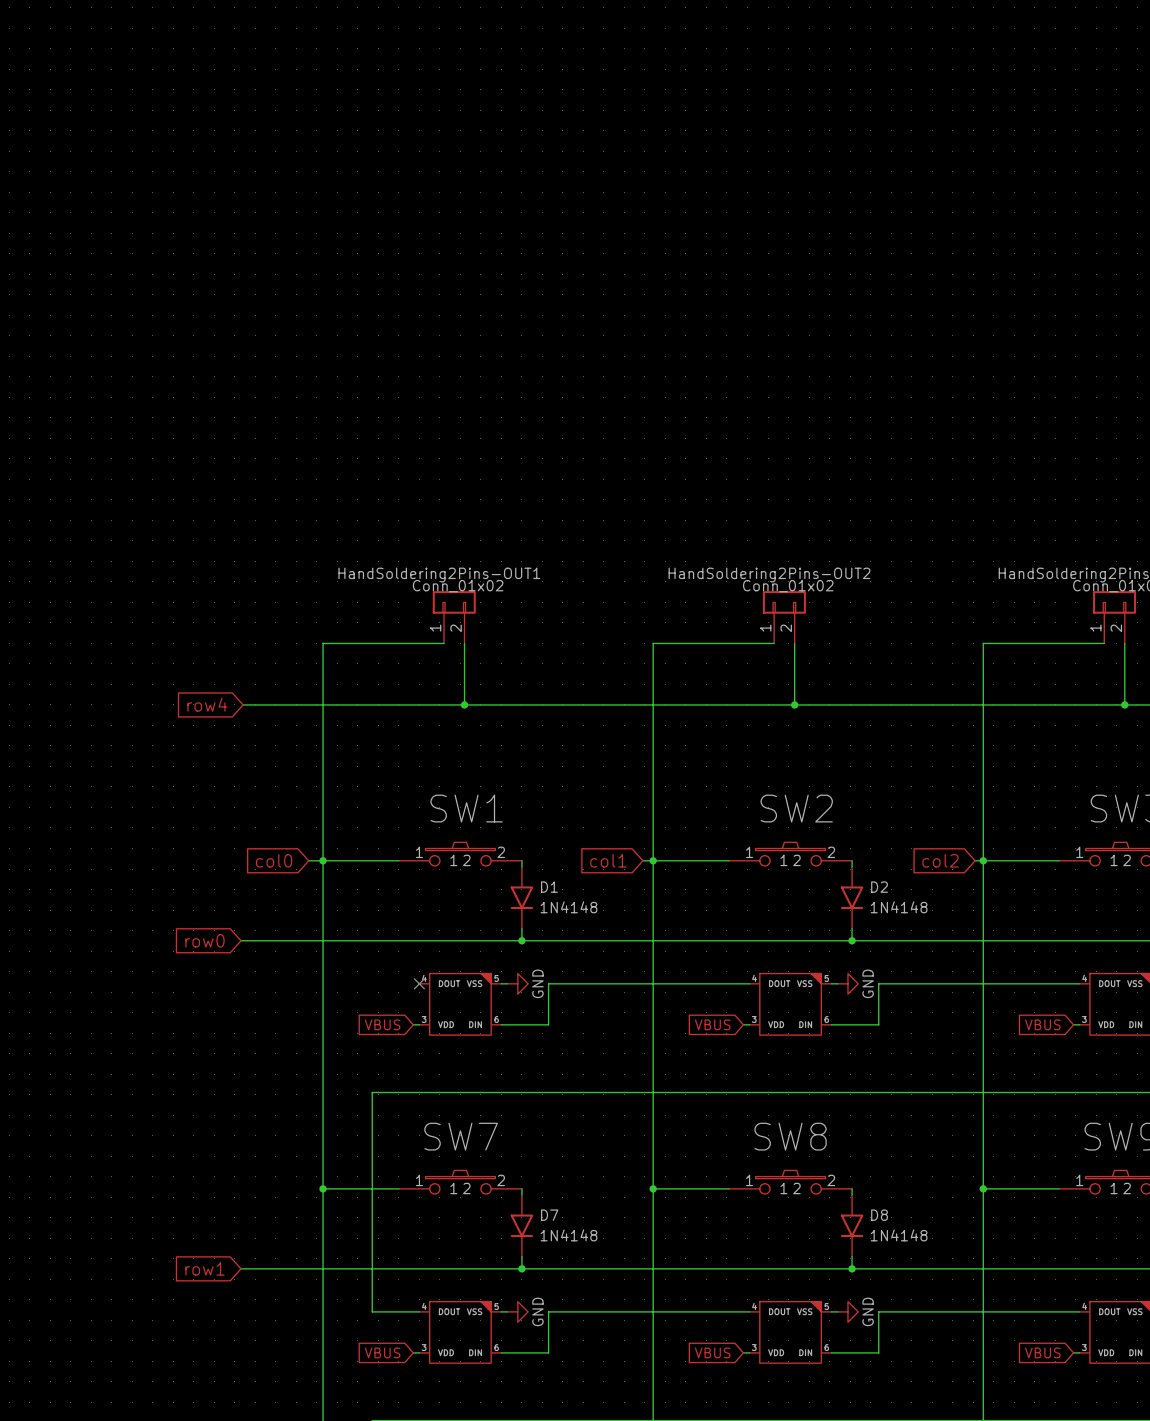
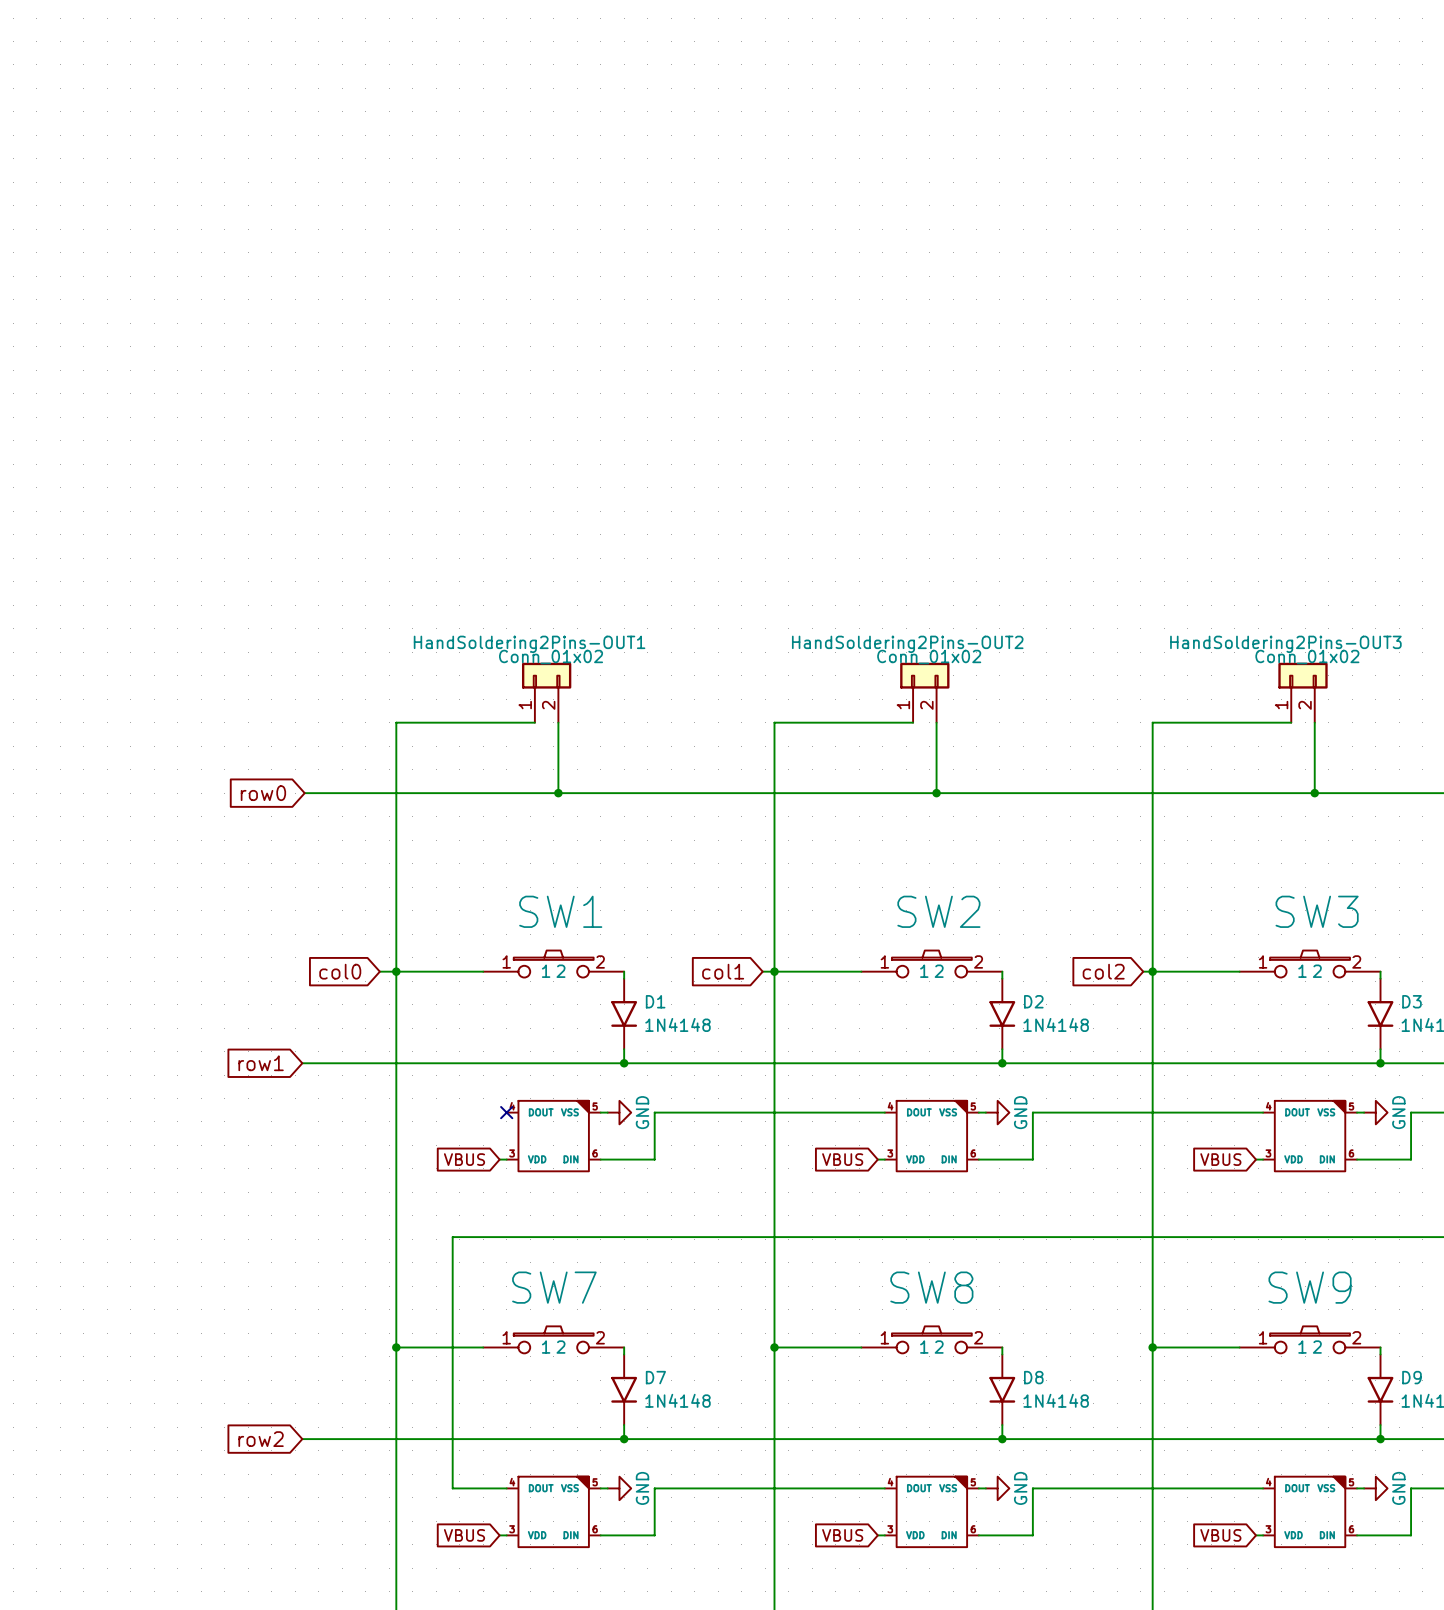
global label: row4 (207, 704) -> row0 (263, 793)
global label: row0 (204, 940) -> row1 (261, 1063)
global label: row1 (204, 1268) -> row2 (261, 1439)

